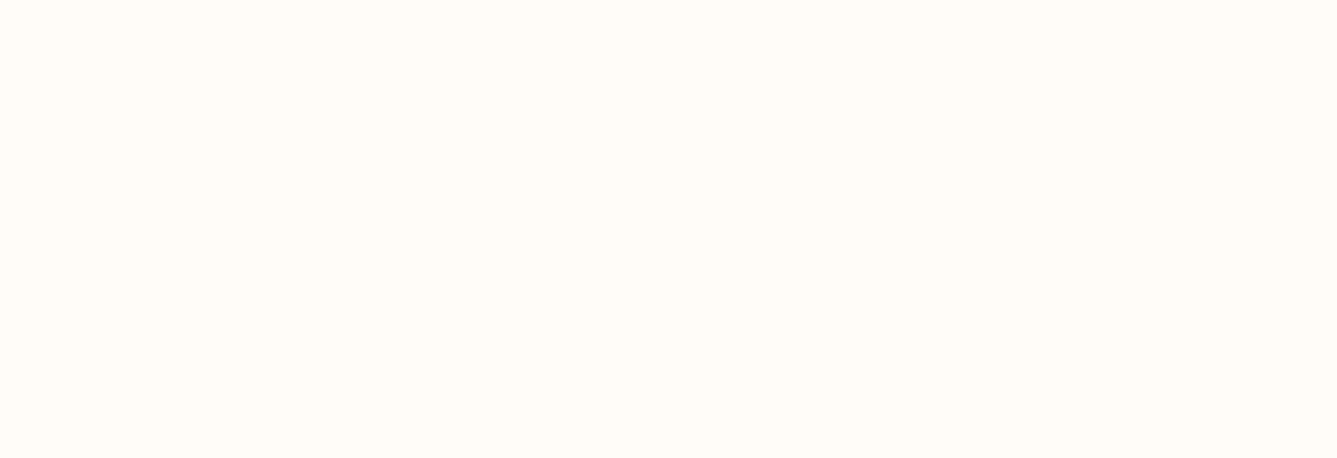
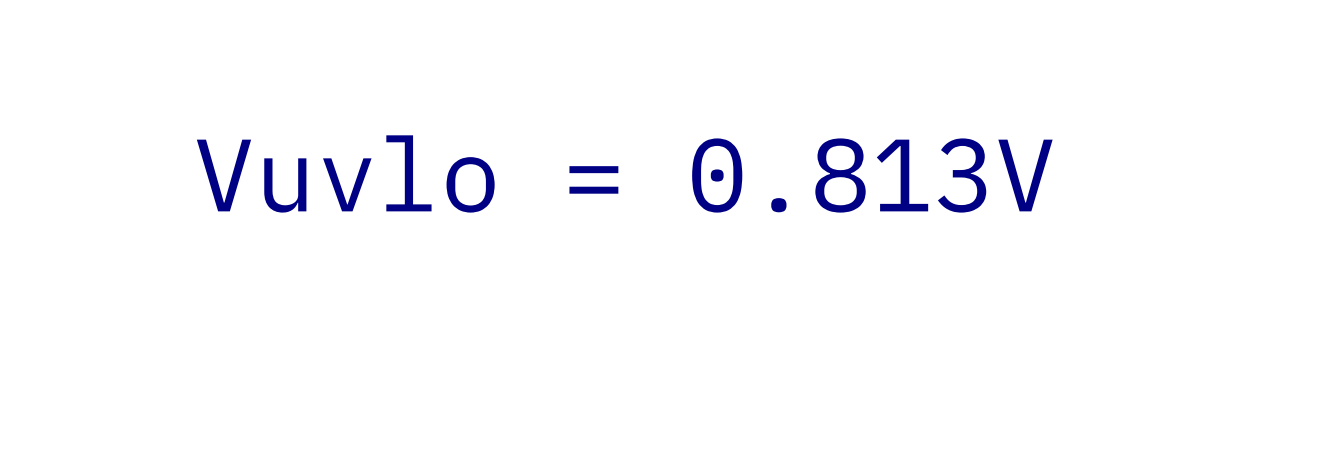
text: none -> Vuvlo = 0.813V (624, 173)

